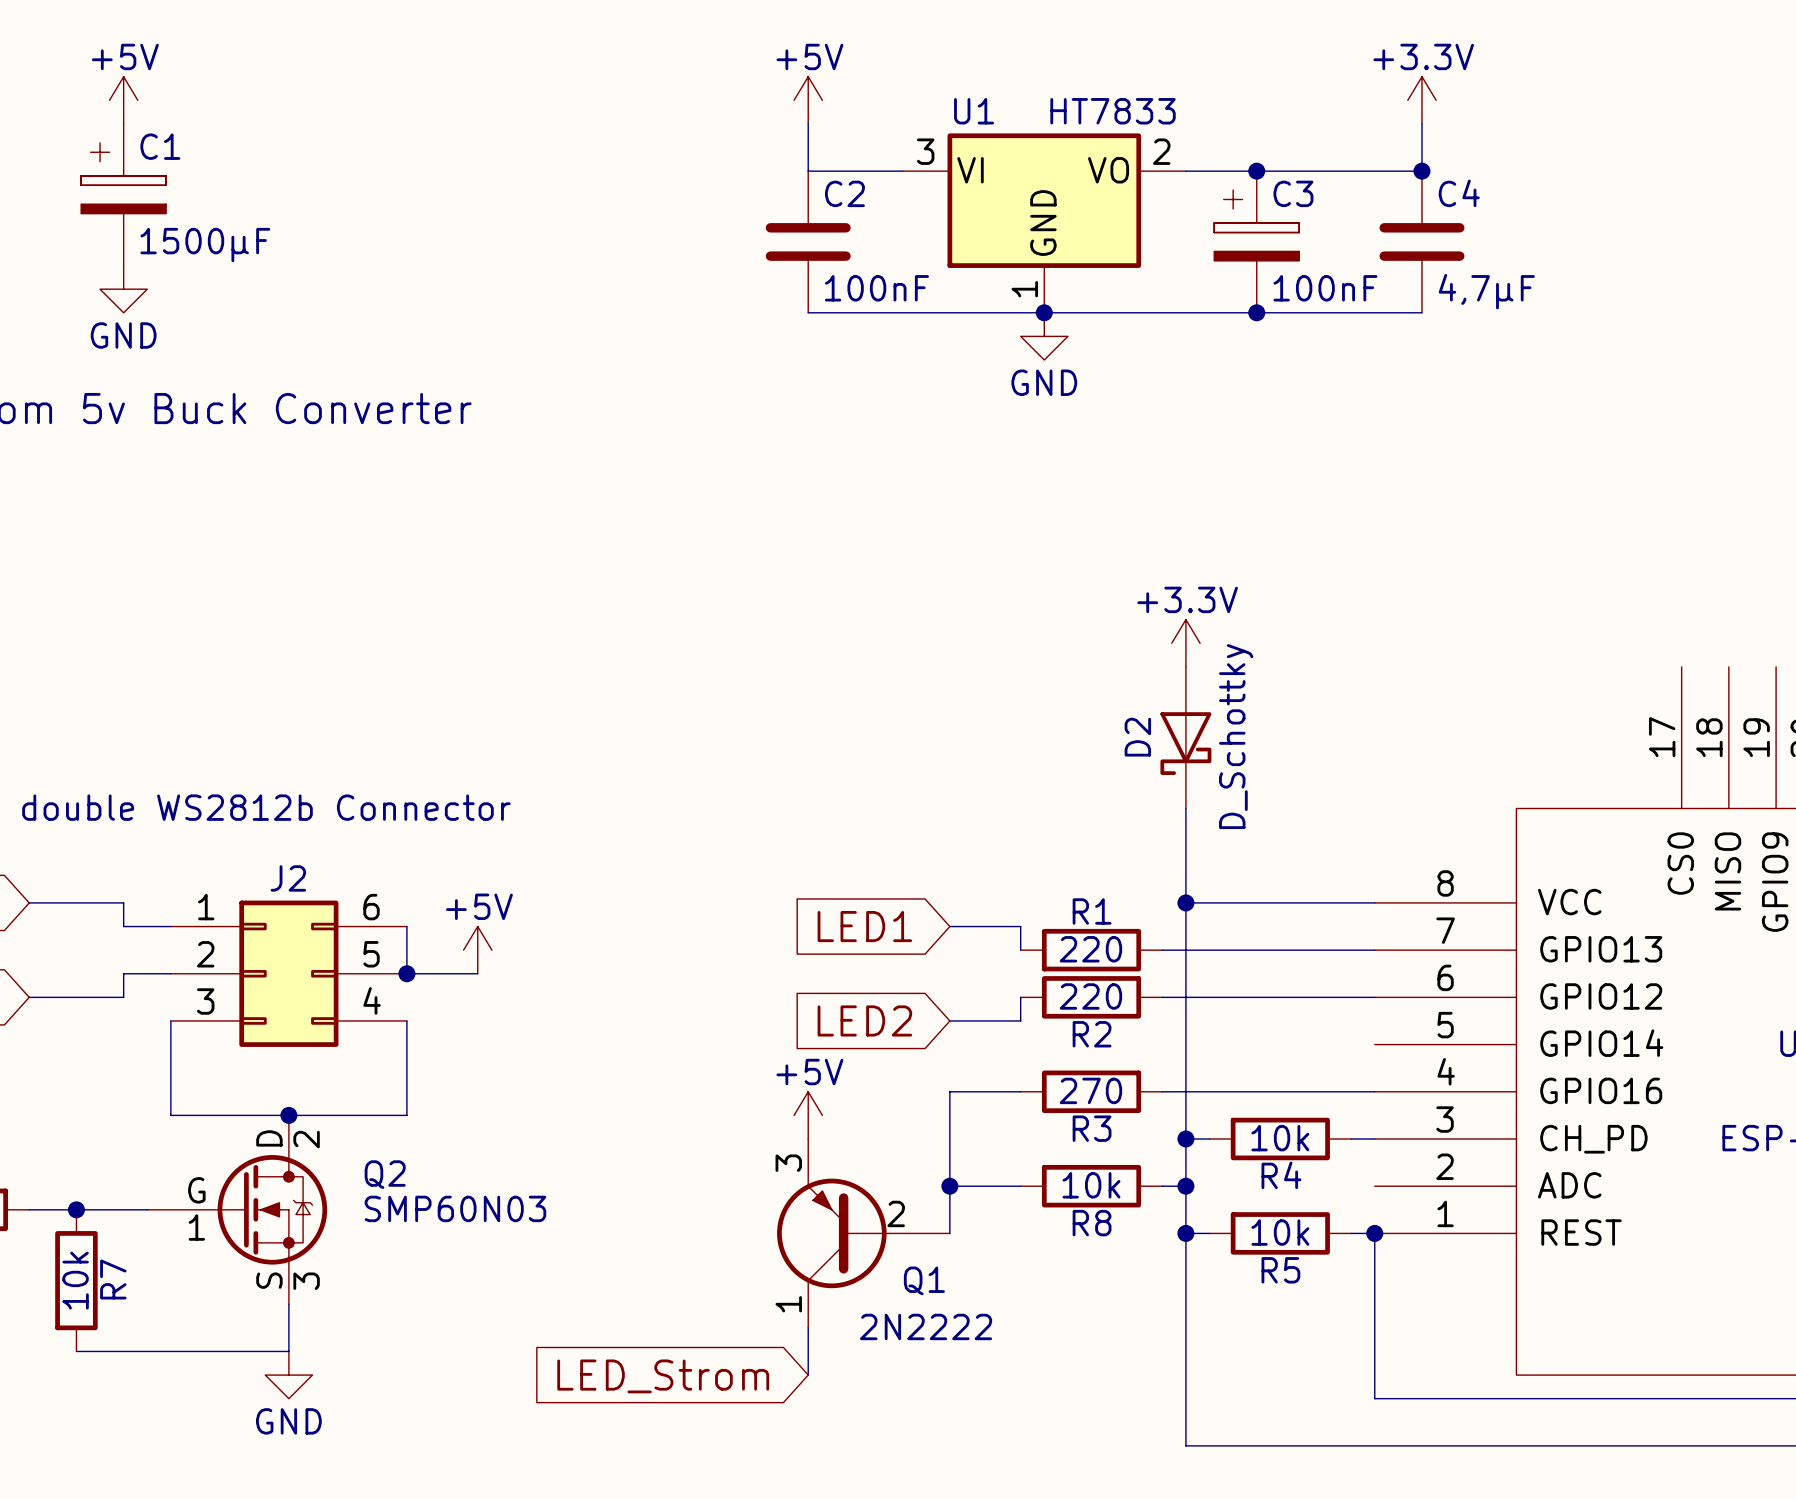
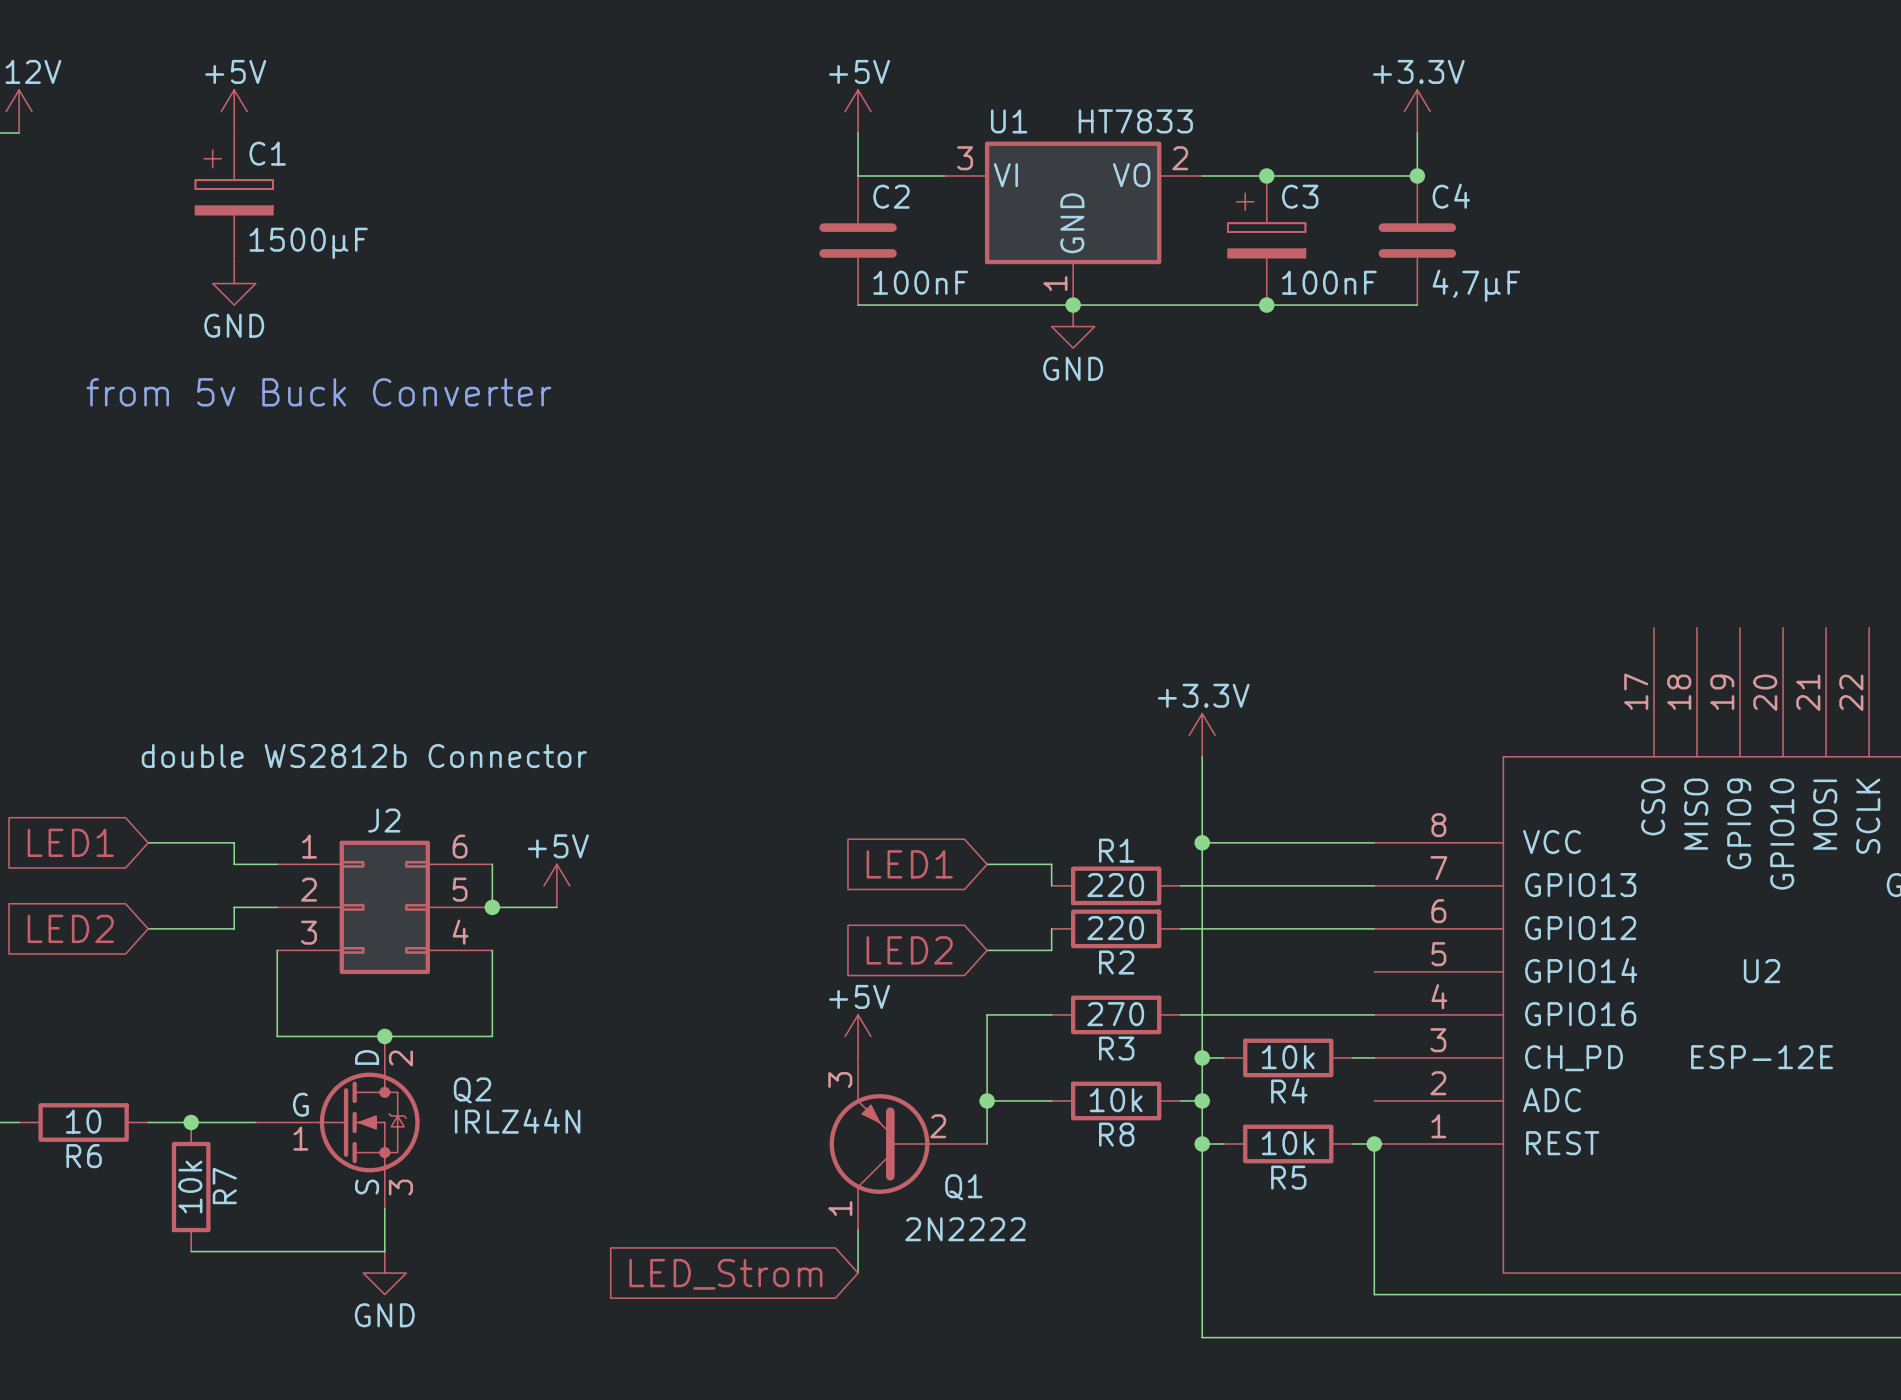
power symbol position: +3.3V (1185, 643) -> +3.3V (1202, 735)
D2: D_Schottky (1185, 737) -> none
Q2 value: SMP60N03 (455, 1208) -> IRLZ44N (517, 1121)

